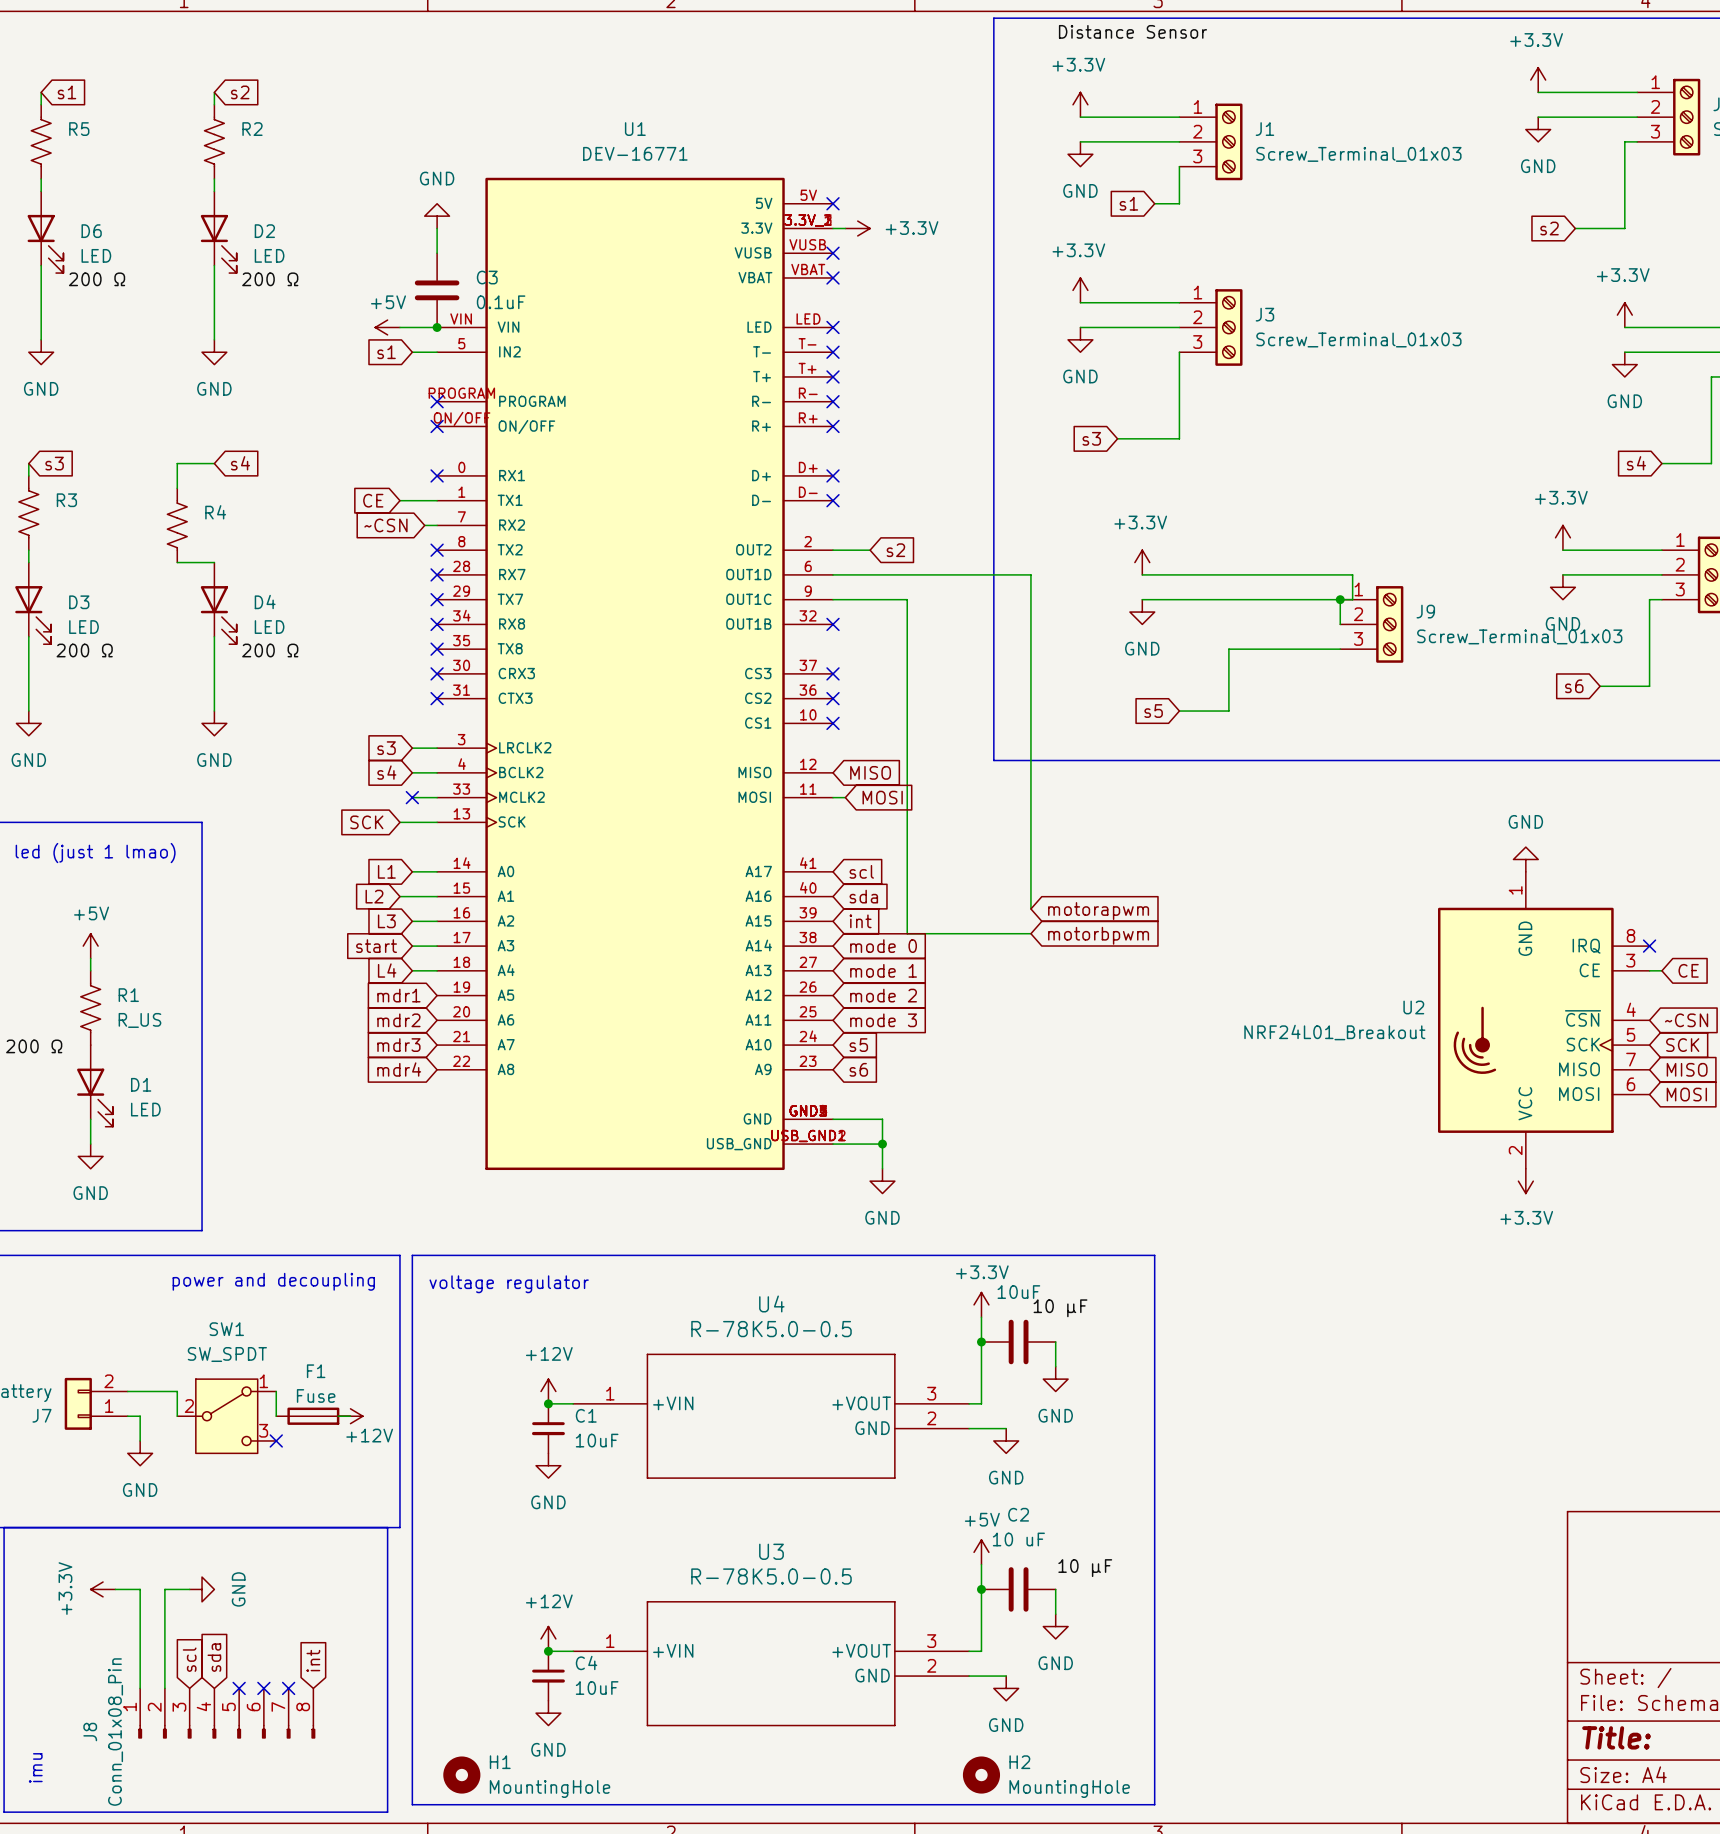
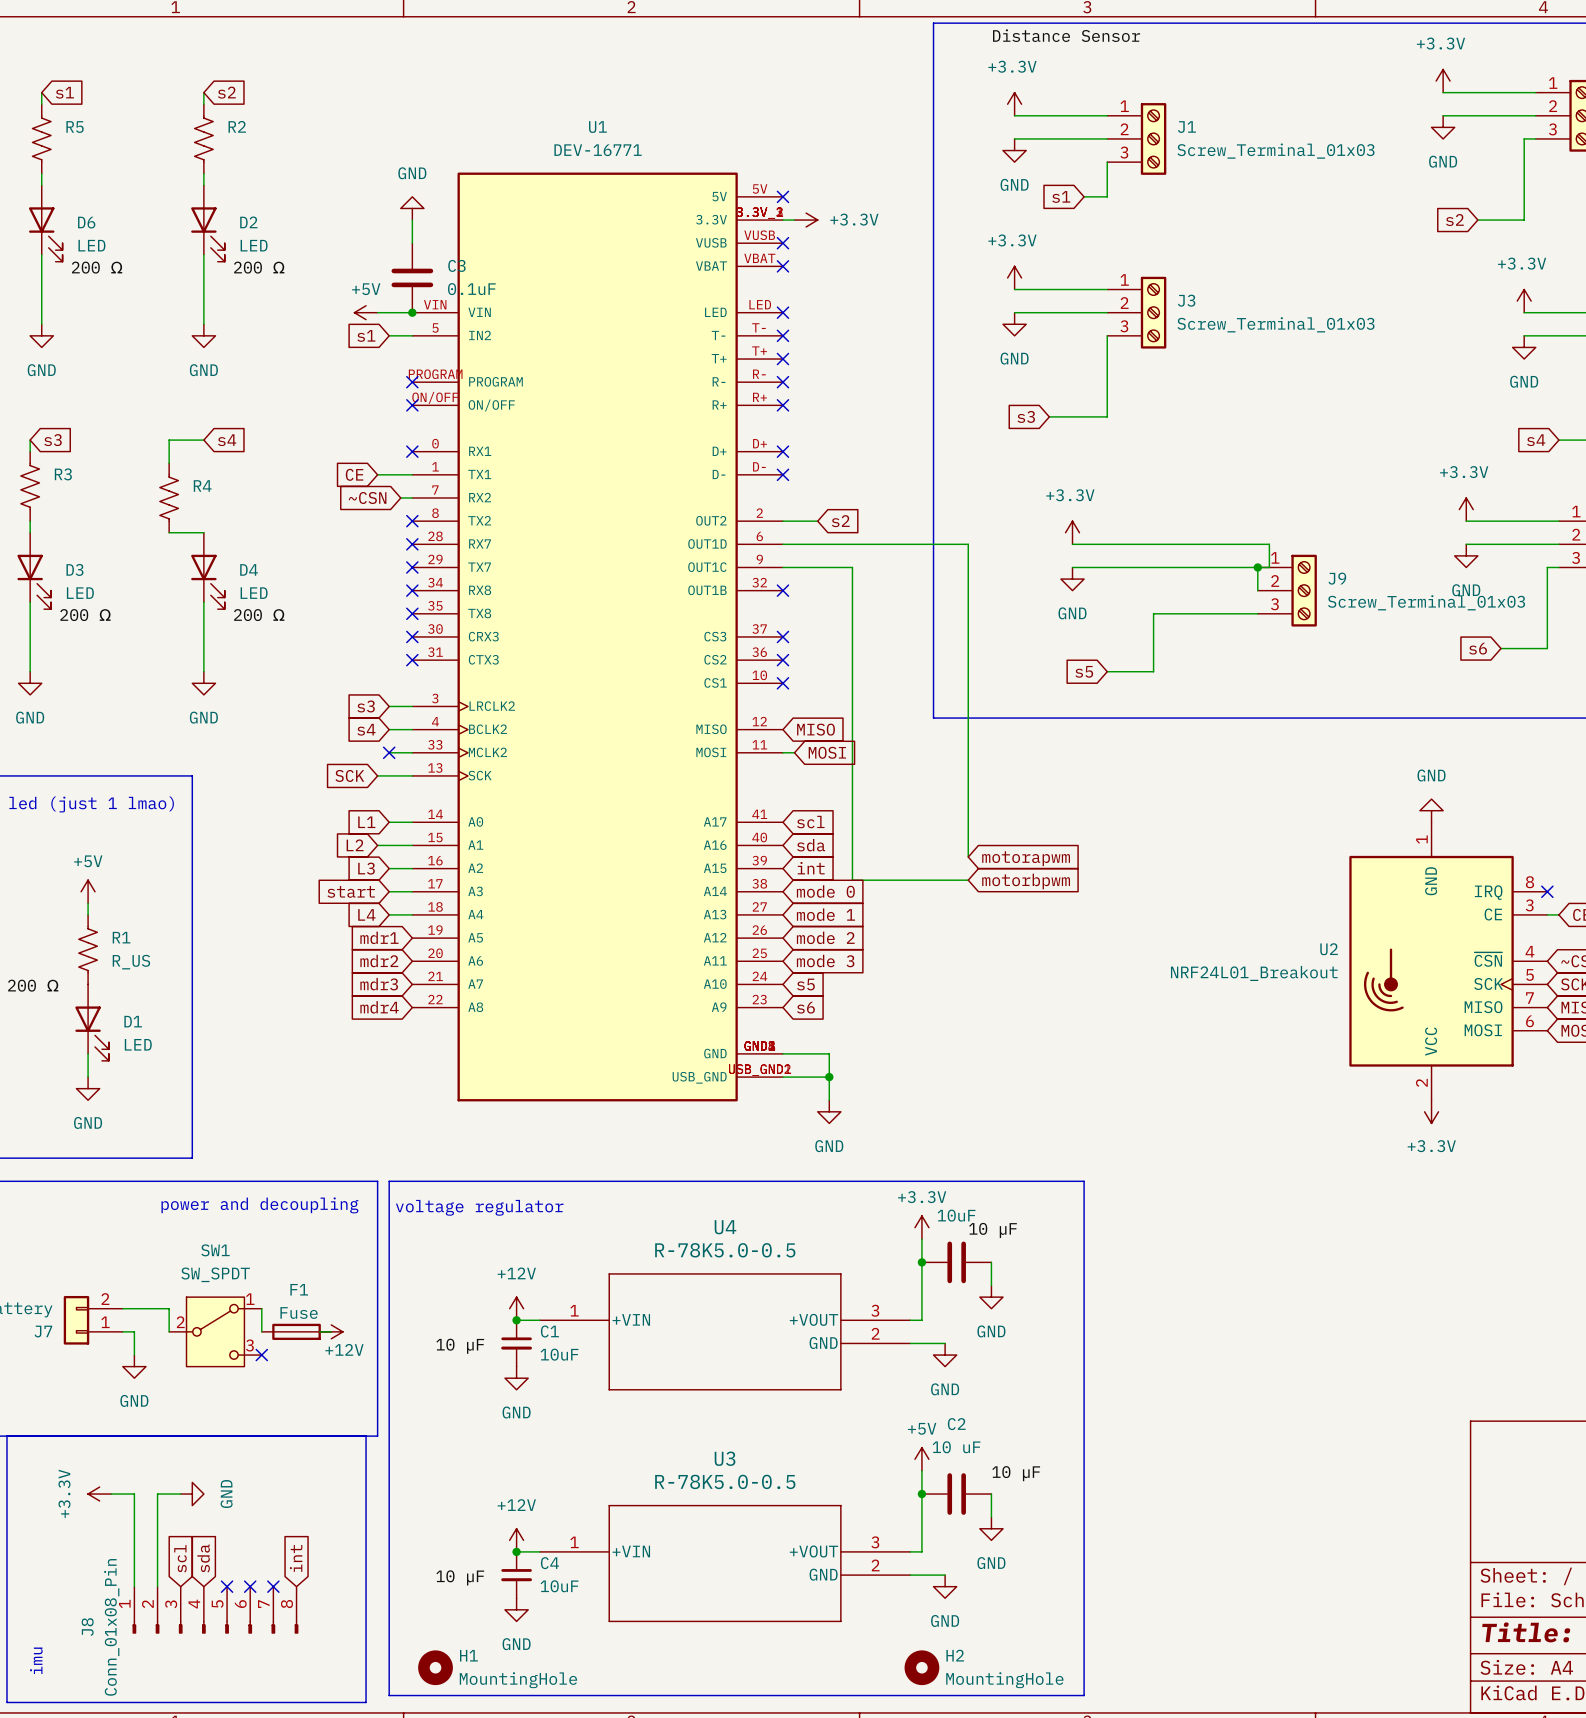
label: none -> 10 µF (460, 1346)
label: none -> 10 µF (460, 1577)

